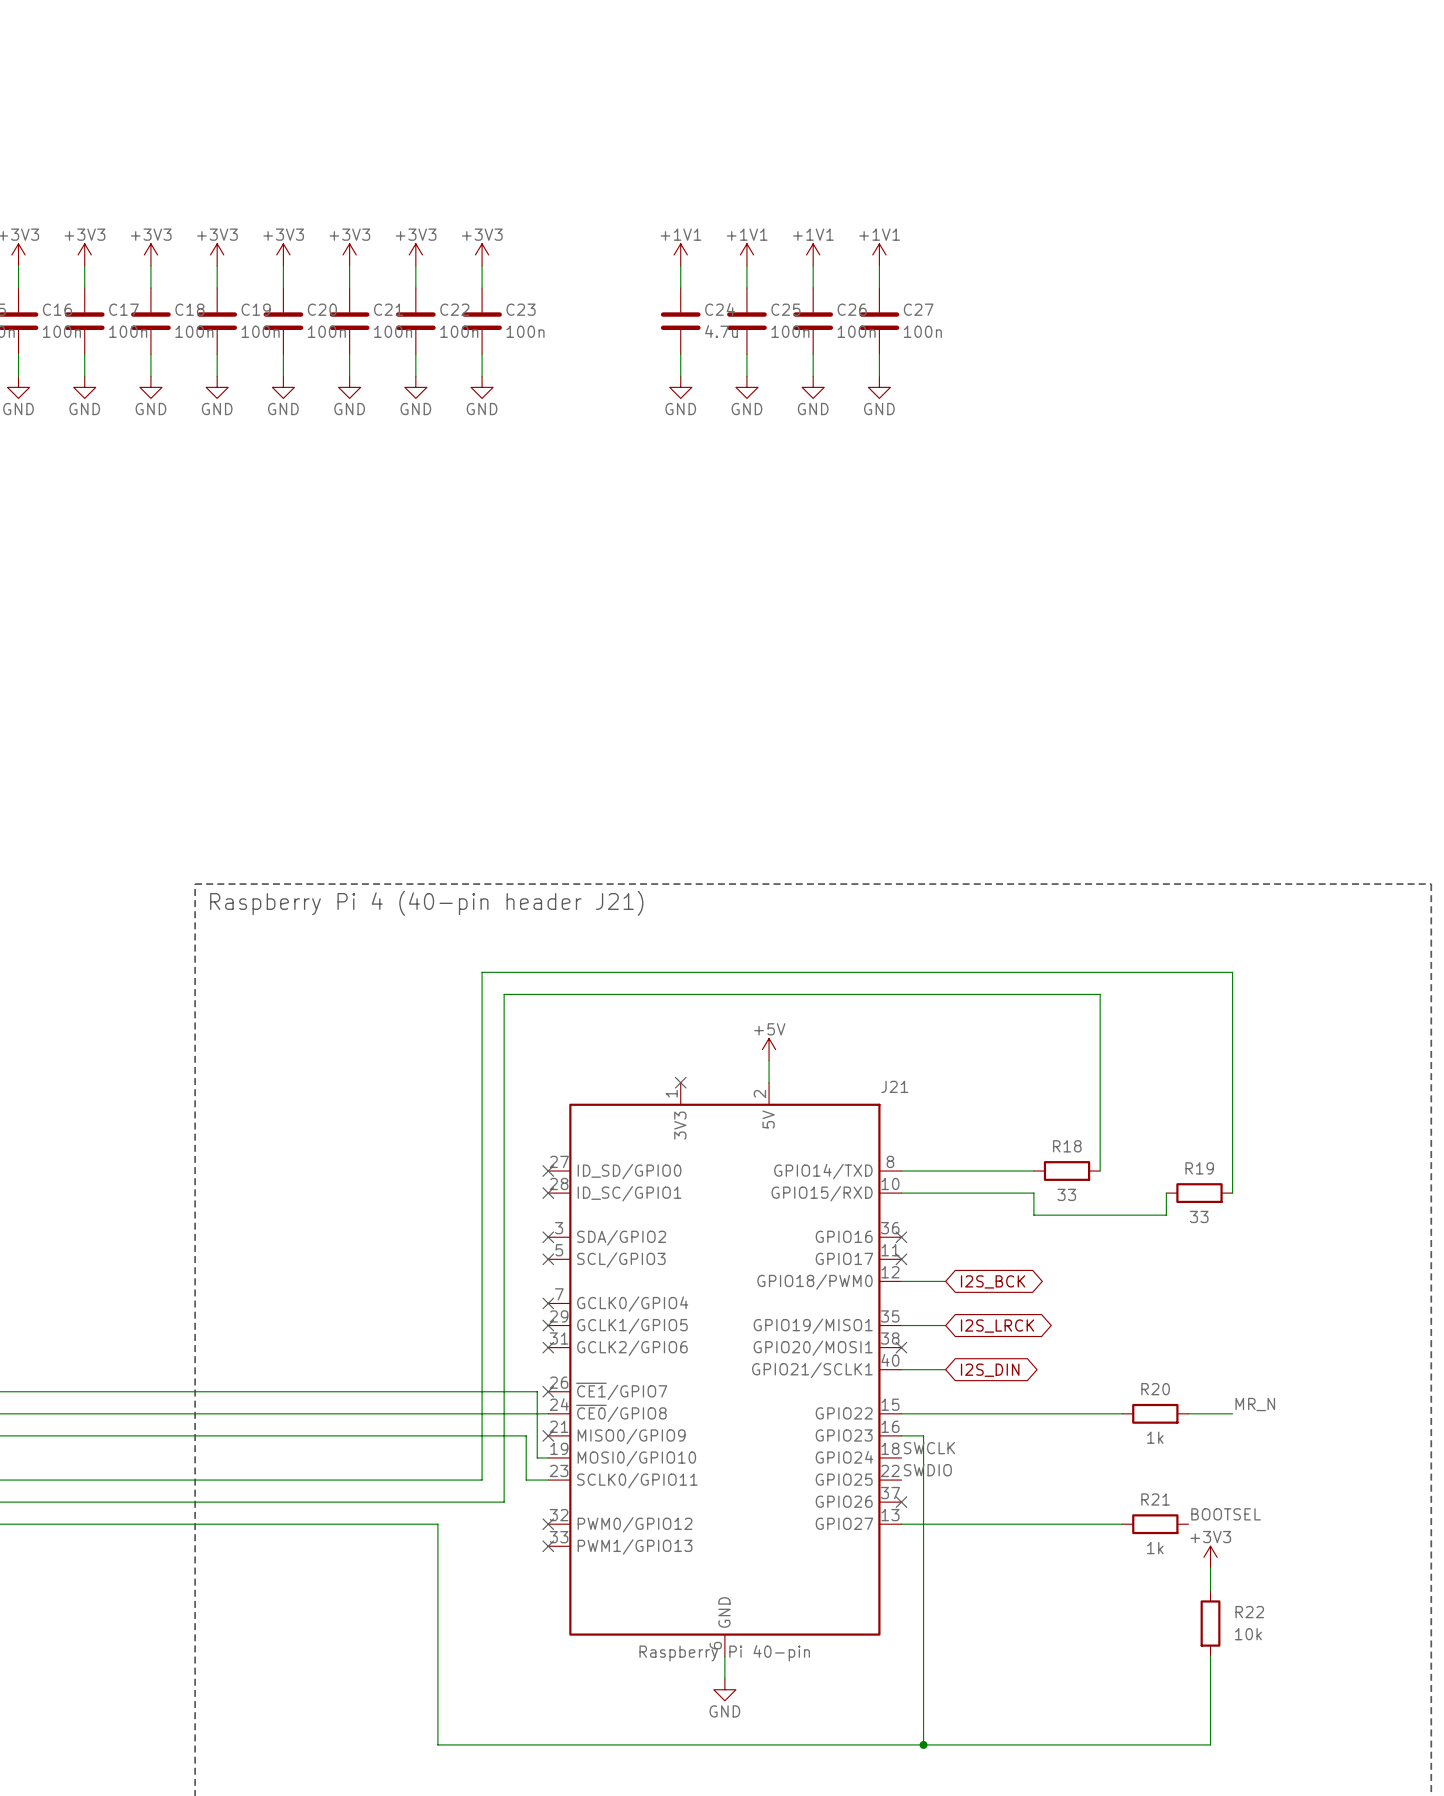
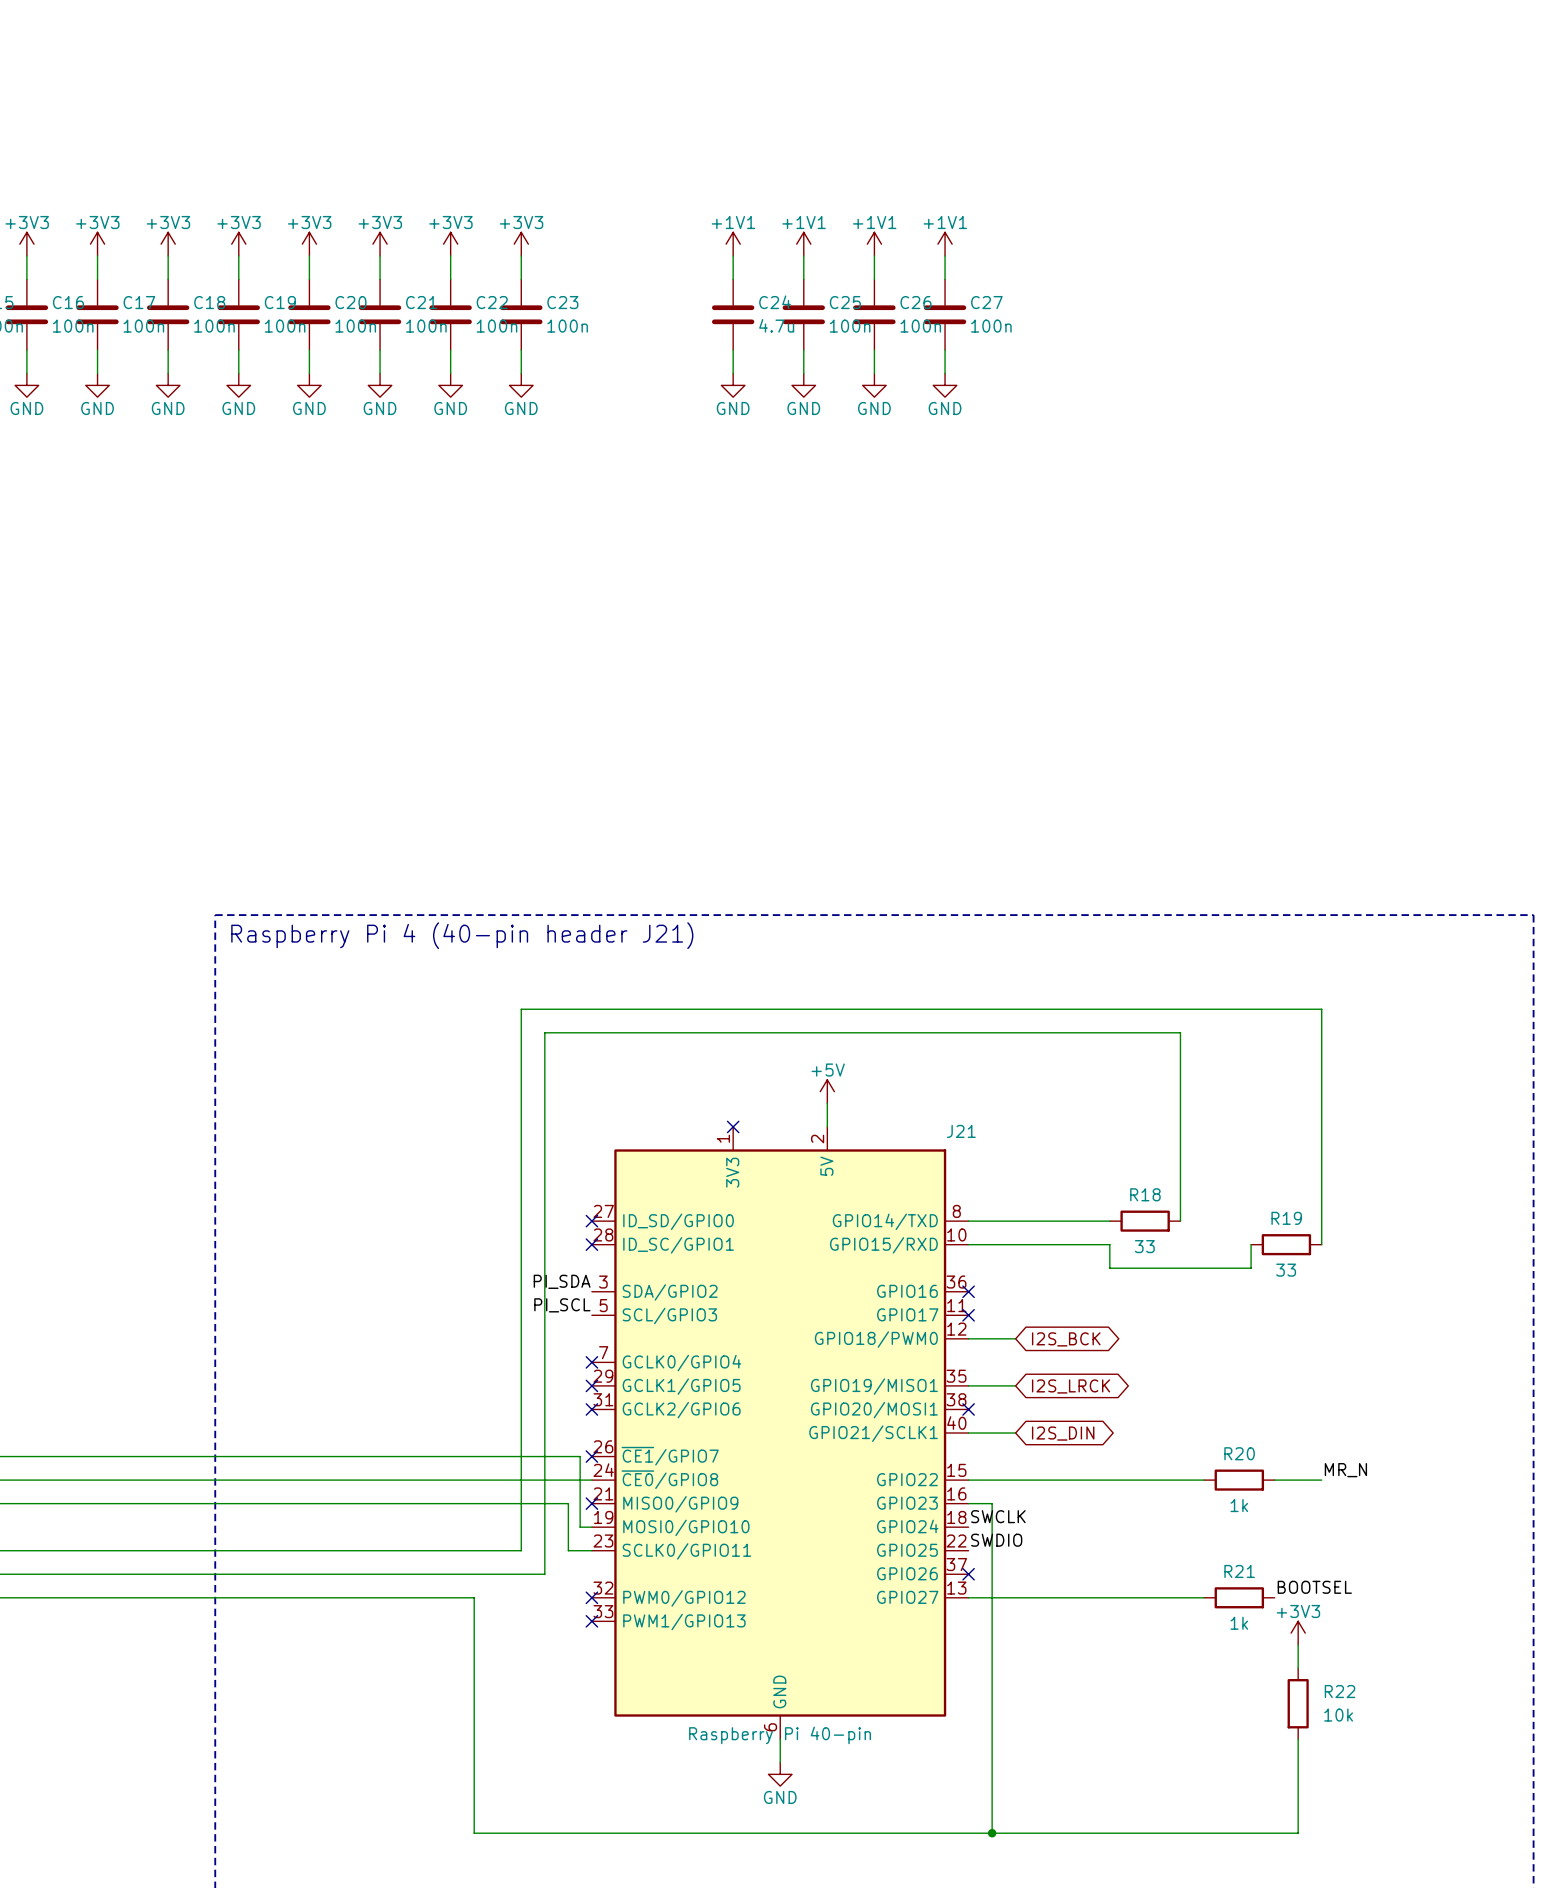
label: none -> PI_SDA (562, 1281)
no-connect mark: (548, 1237) -> none
label: none -> PI_SCL (562, 1305)
no-connect mark: (548, 1259) -> none

